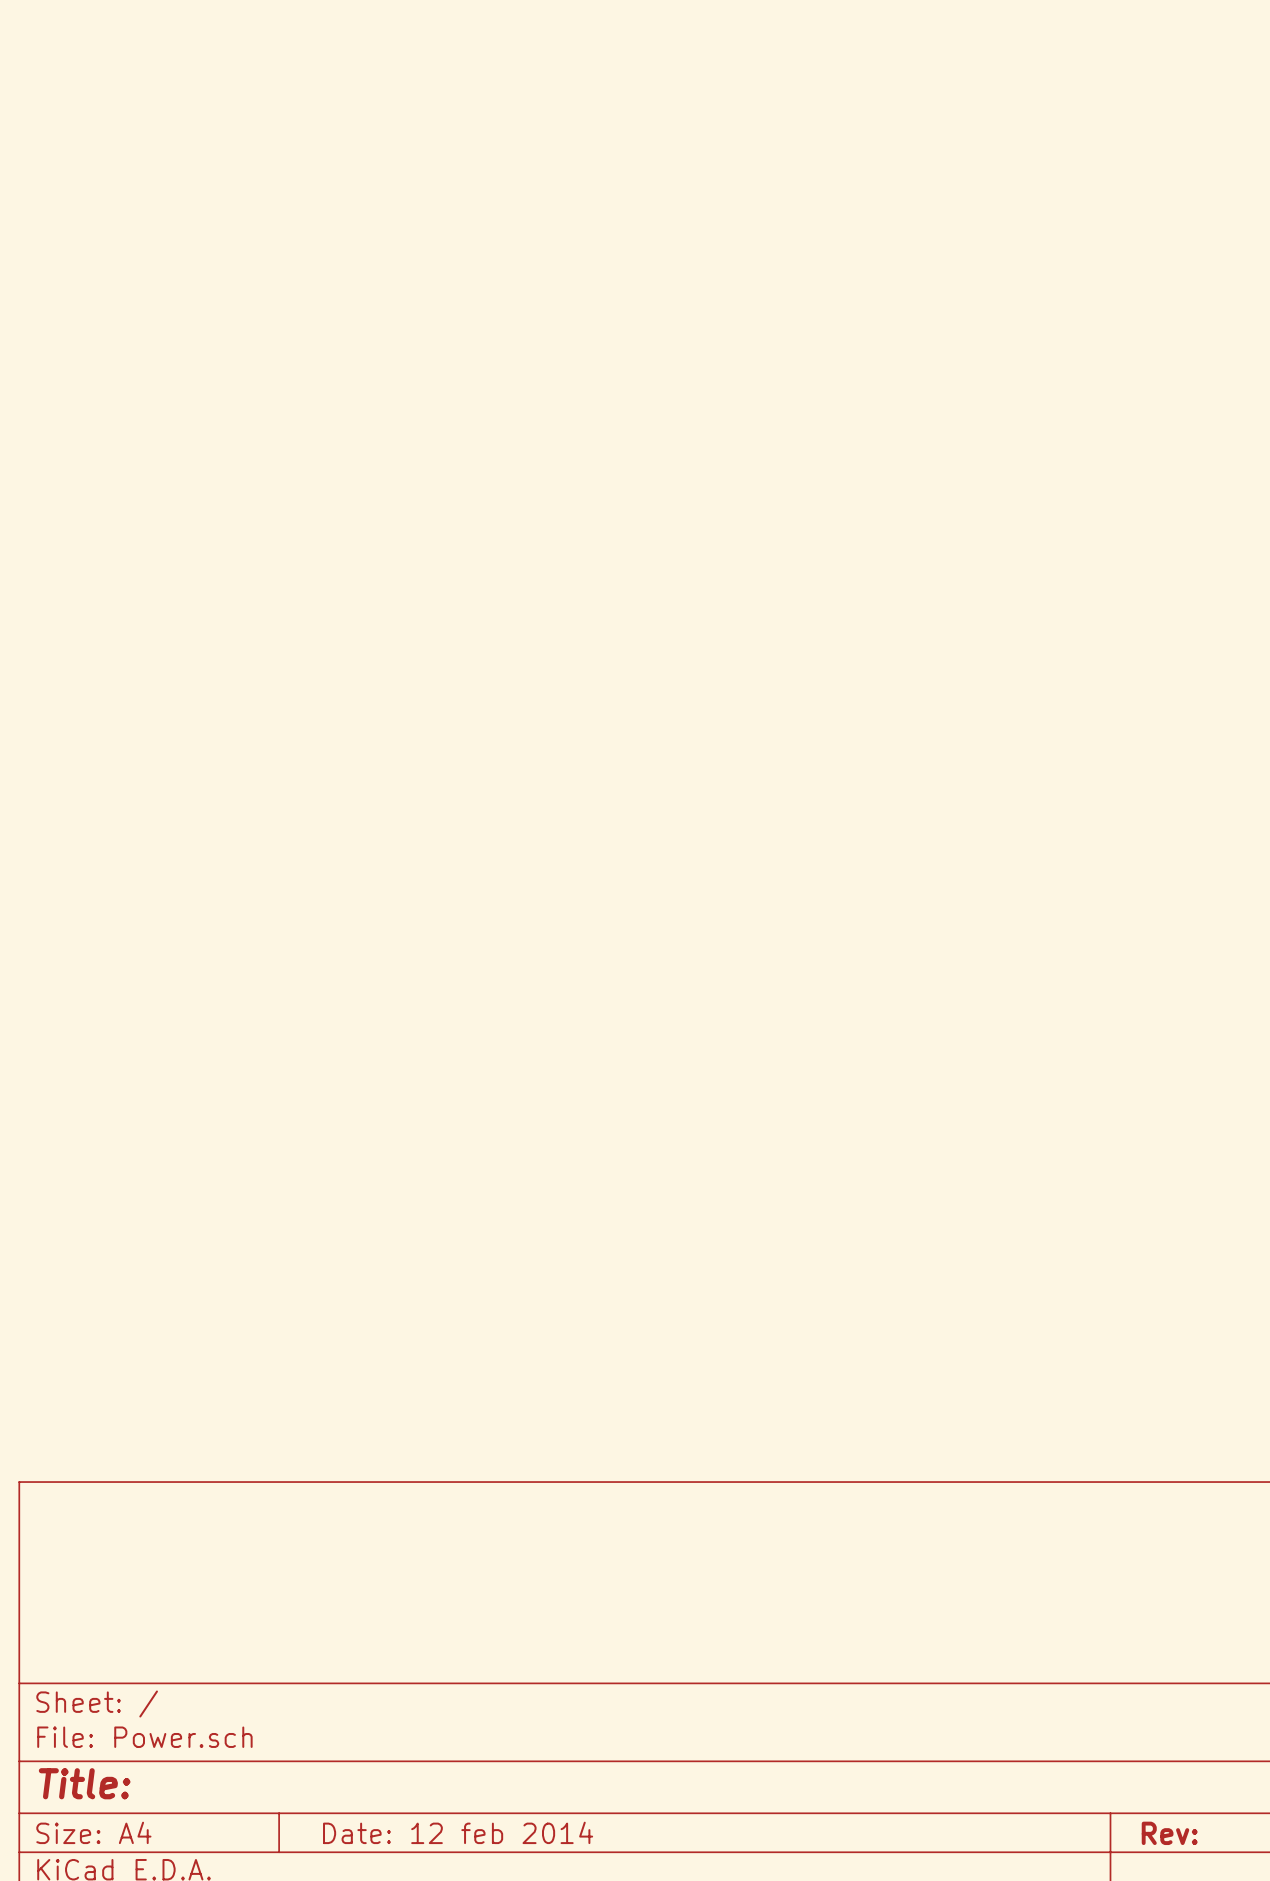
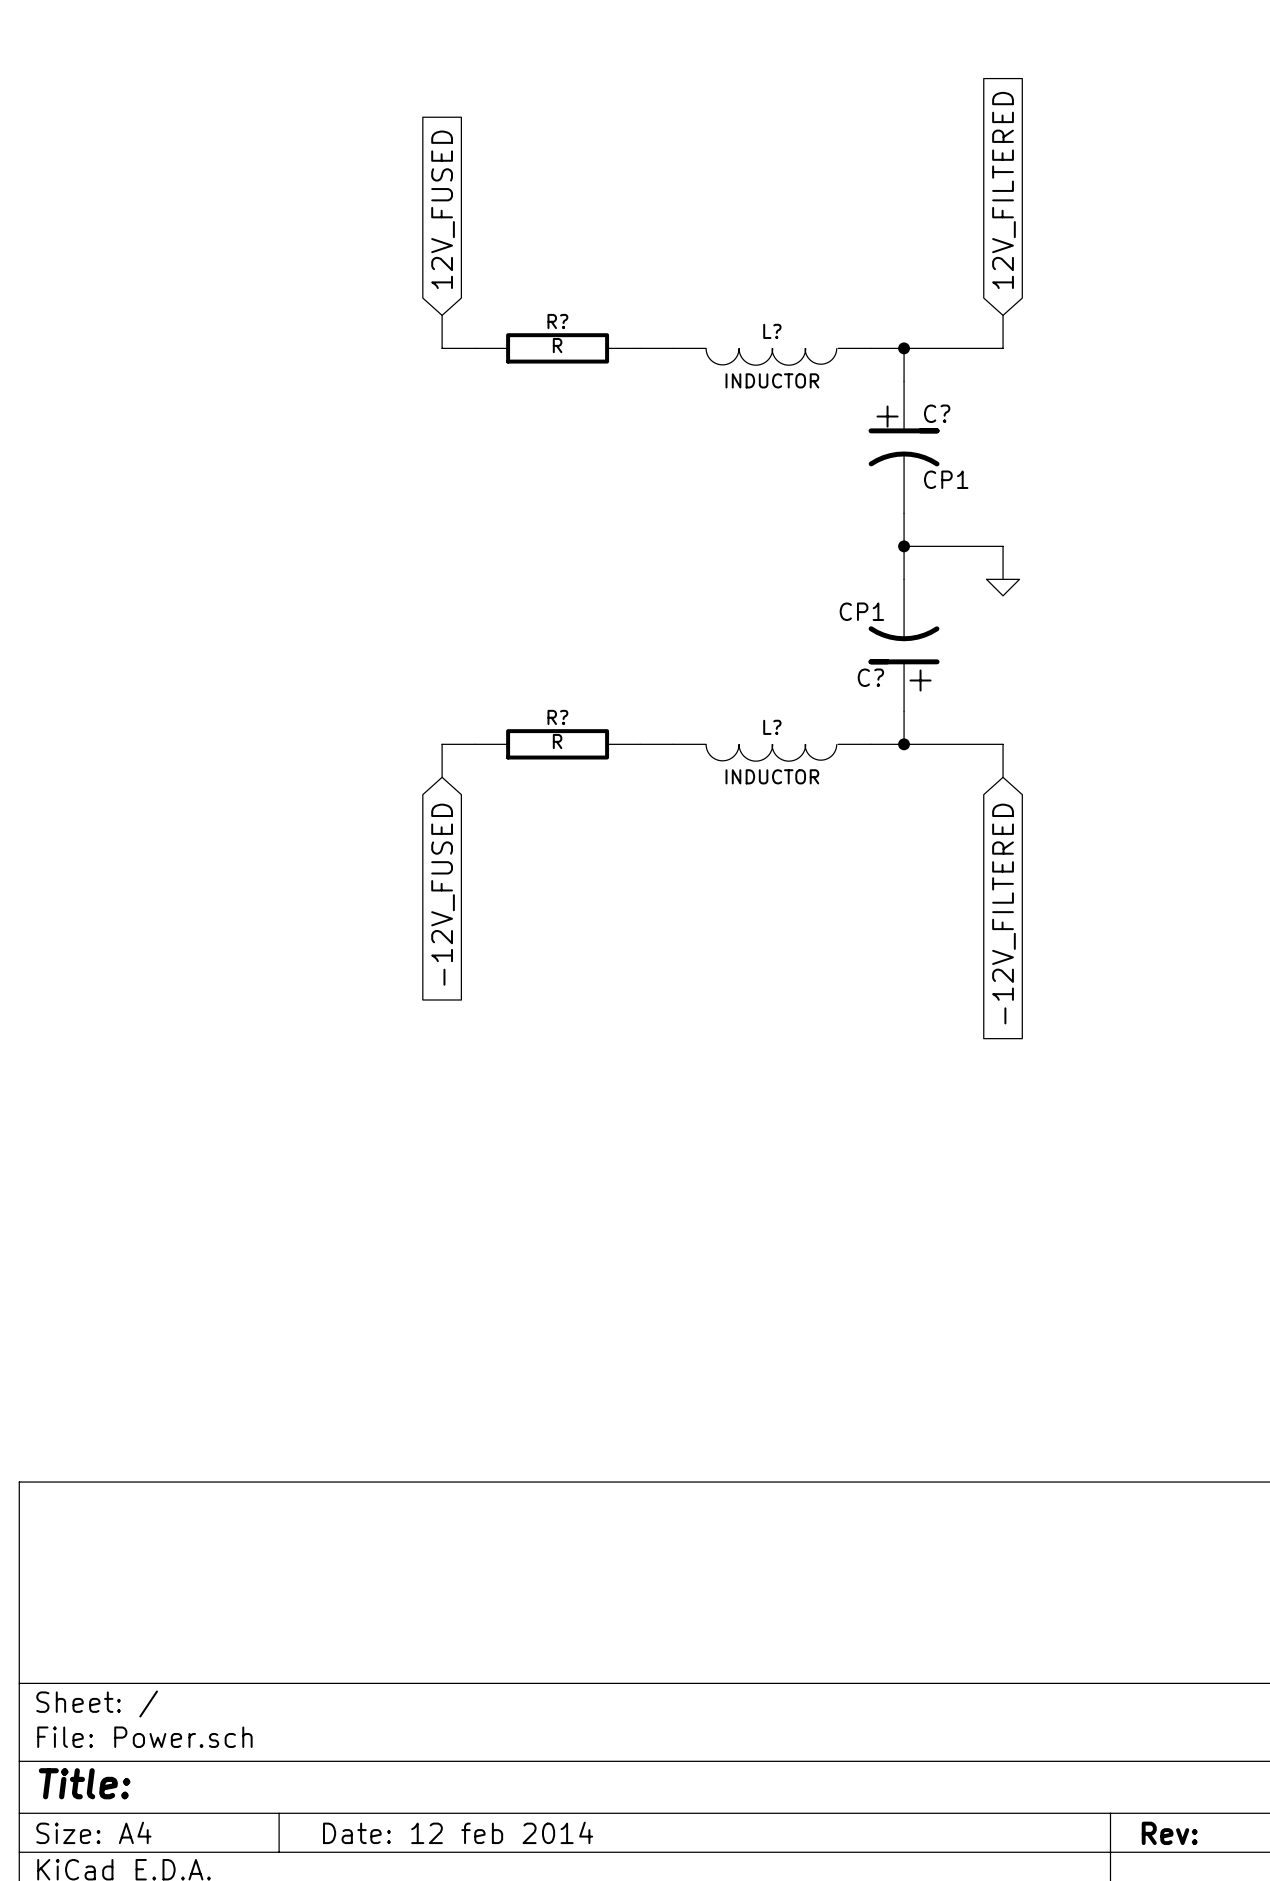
global label: none -> 12V_FILTERED (1003, 190)
global label: none -> 12V_FUSED (443, 209)
wire: none -> (442, 315) (442, 348) (475, 348)
wire: none -> (1003, 315) (1003, 348) (871, 348)
R?: none -> R (557, 348)
wire: none -> (640, 348) (673, 348)
wire: none -> (904, 348) (904, 381)
junction: none -> (904, 348)
L?: none -> INDUCTOR (772, 356)
C?: none -> CP1 (904, 447)
wire: none -> (904, 513) (904, 579)
wire: none -> (904, 546) (1003, 546) (1003, 579)
junction: none -> (904, 546)
power symbol: none -> (1003, 587)
C?: none -> CP1 (904, 645)
wire: none -> (904, 711) (904, 744)
wire: none -> (475, 744) (442, 744) (442, 777)
R?: none -> R (557, 744)
wire: none -> (640, 744) (673, 744)
wire: none -> (871, 744) (1003, 744) (1003, 777)
junction: none -> (904, 744)
L?: none -> INDUCTOR (772, 752)
global label: none -> -12V_FUSED (443, 894)
global label: none -> -12V_FILTERED (1003, 914)

